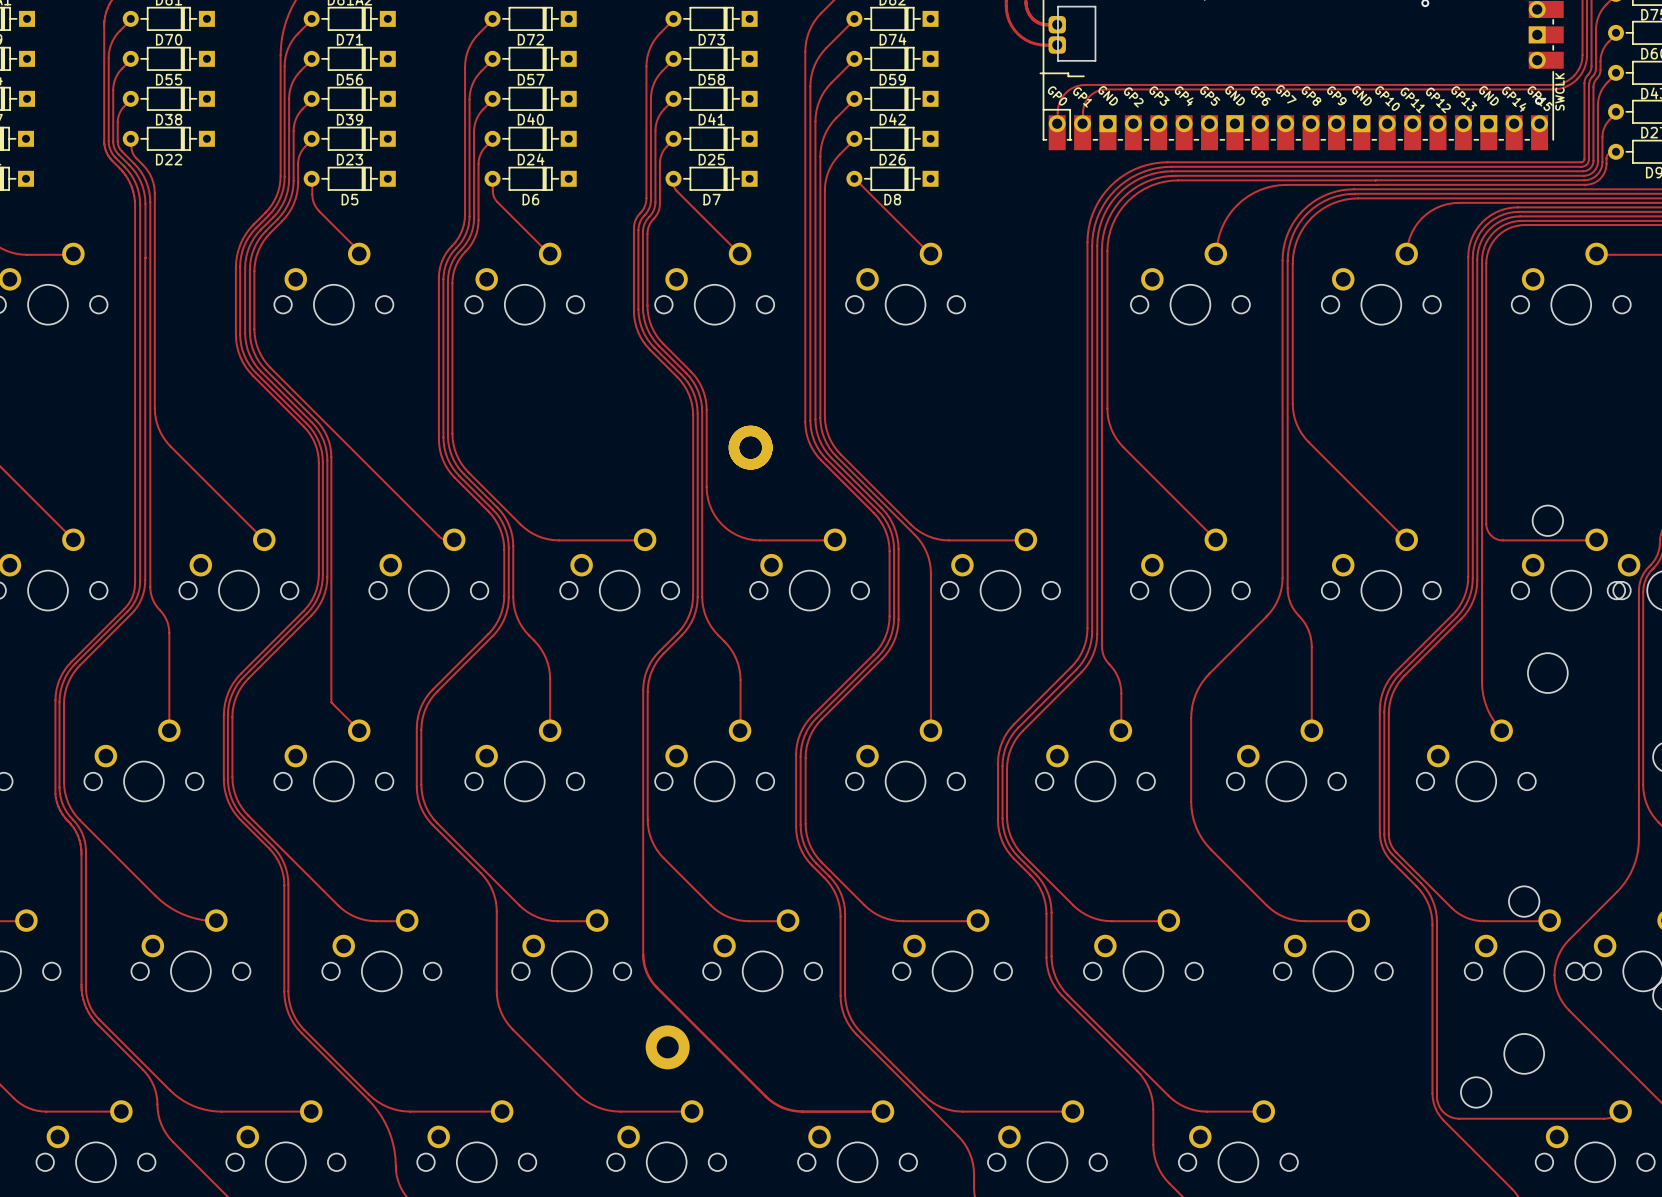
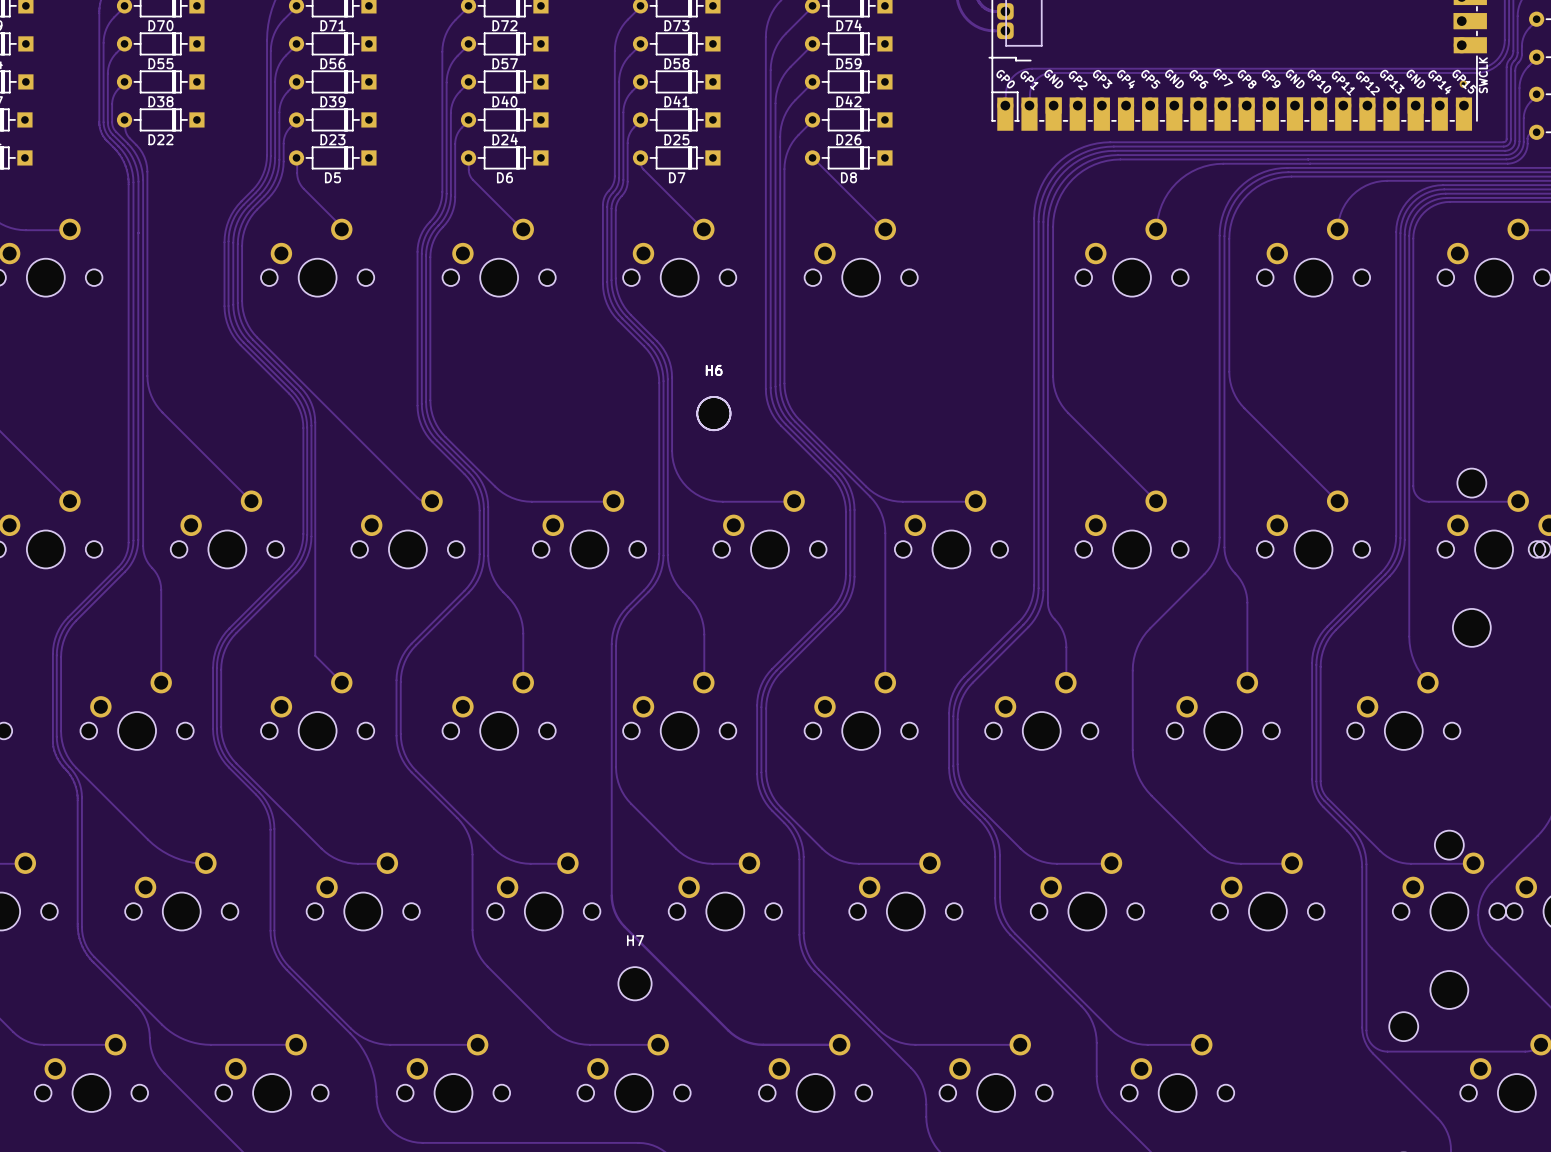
part: (750, 447) -> none
H6: none -> (713, 413)
part: (667, 1047) -> none
H7: none -> (635, 983)

